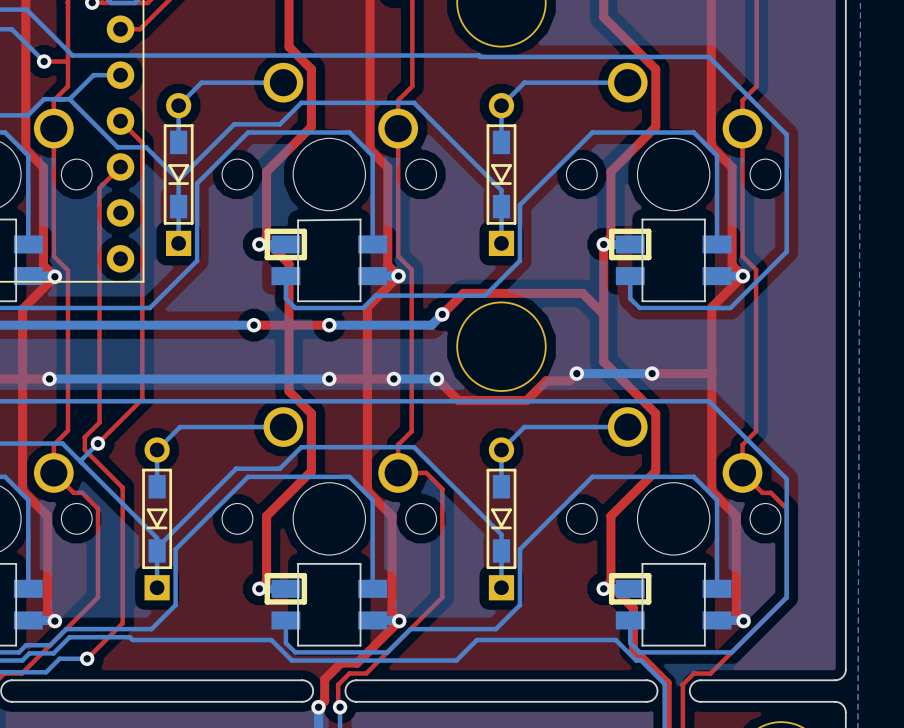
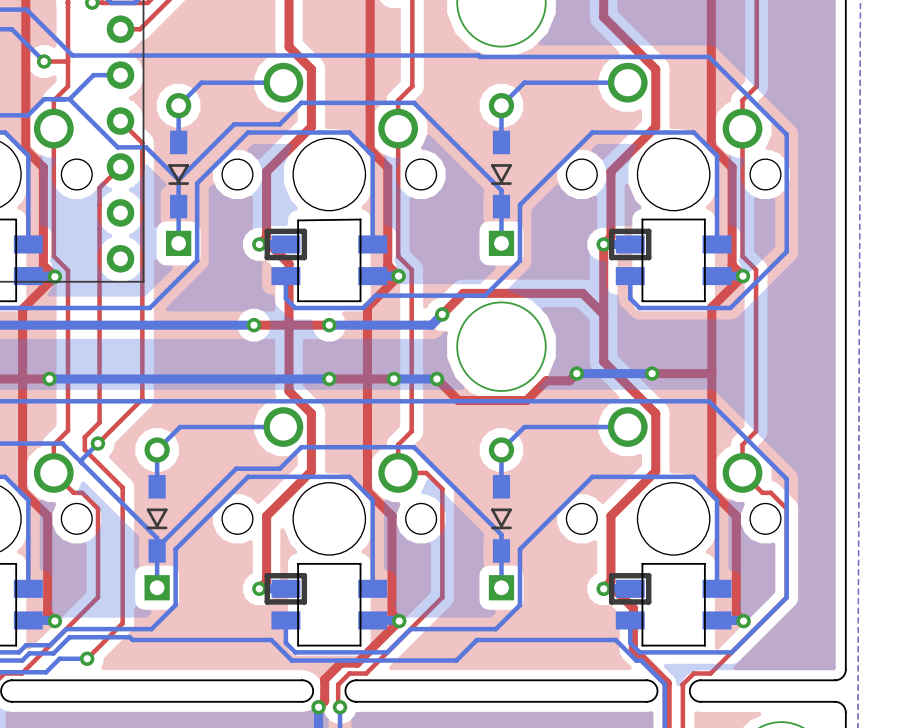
part footprint: [163, 93, 194, 257] -> [166, 93, 192, 257]
part footprint: [486, 93, 517, 257] -> [488, 93, 515, 257]
part footprint: [142, 437, 173, 601] -> [144, 437, 170, 601]
part footprint: [486, 437, 517, 601] -> [488, 437, 515, 601]

